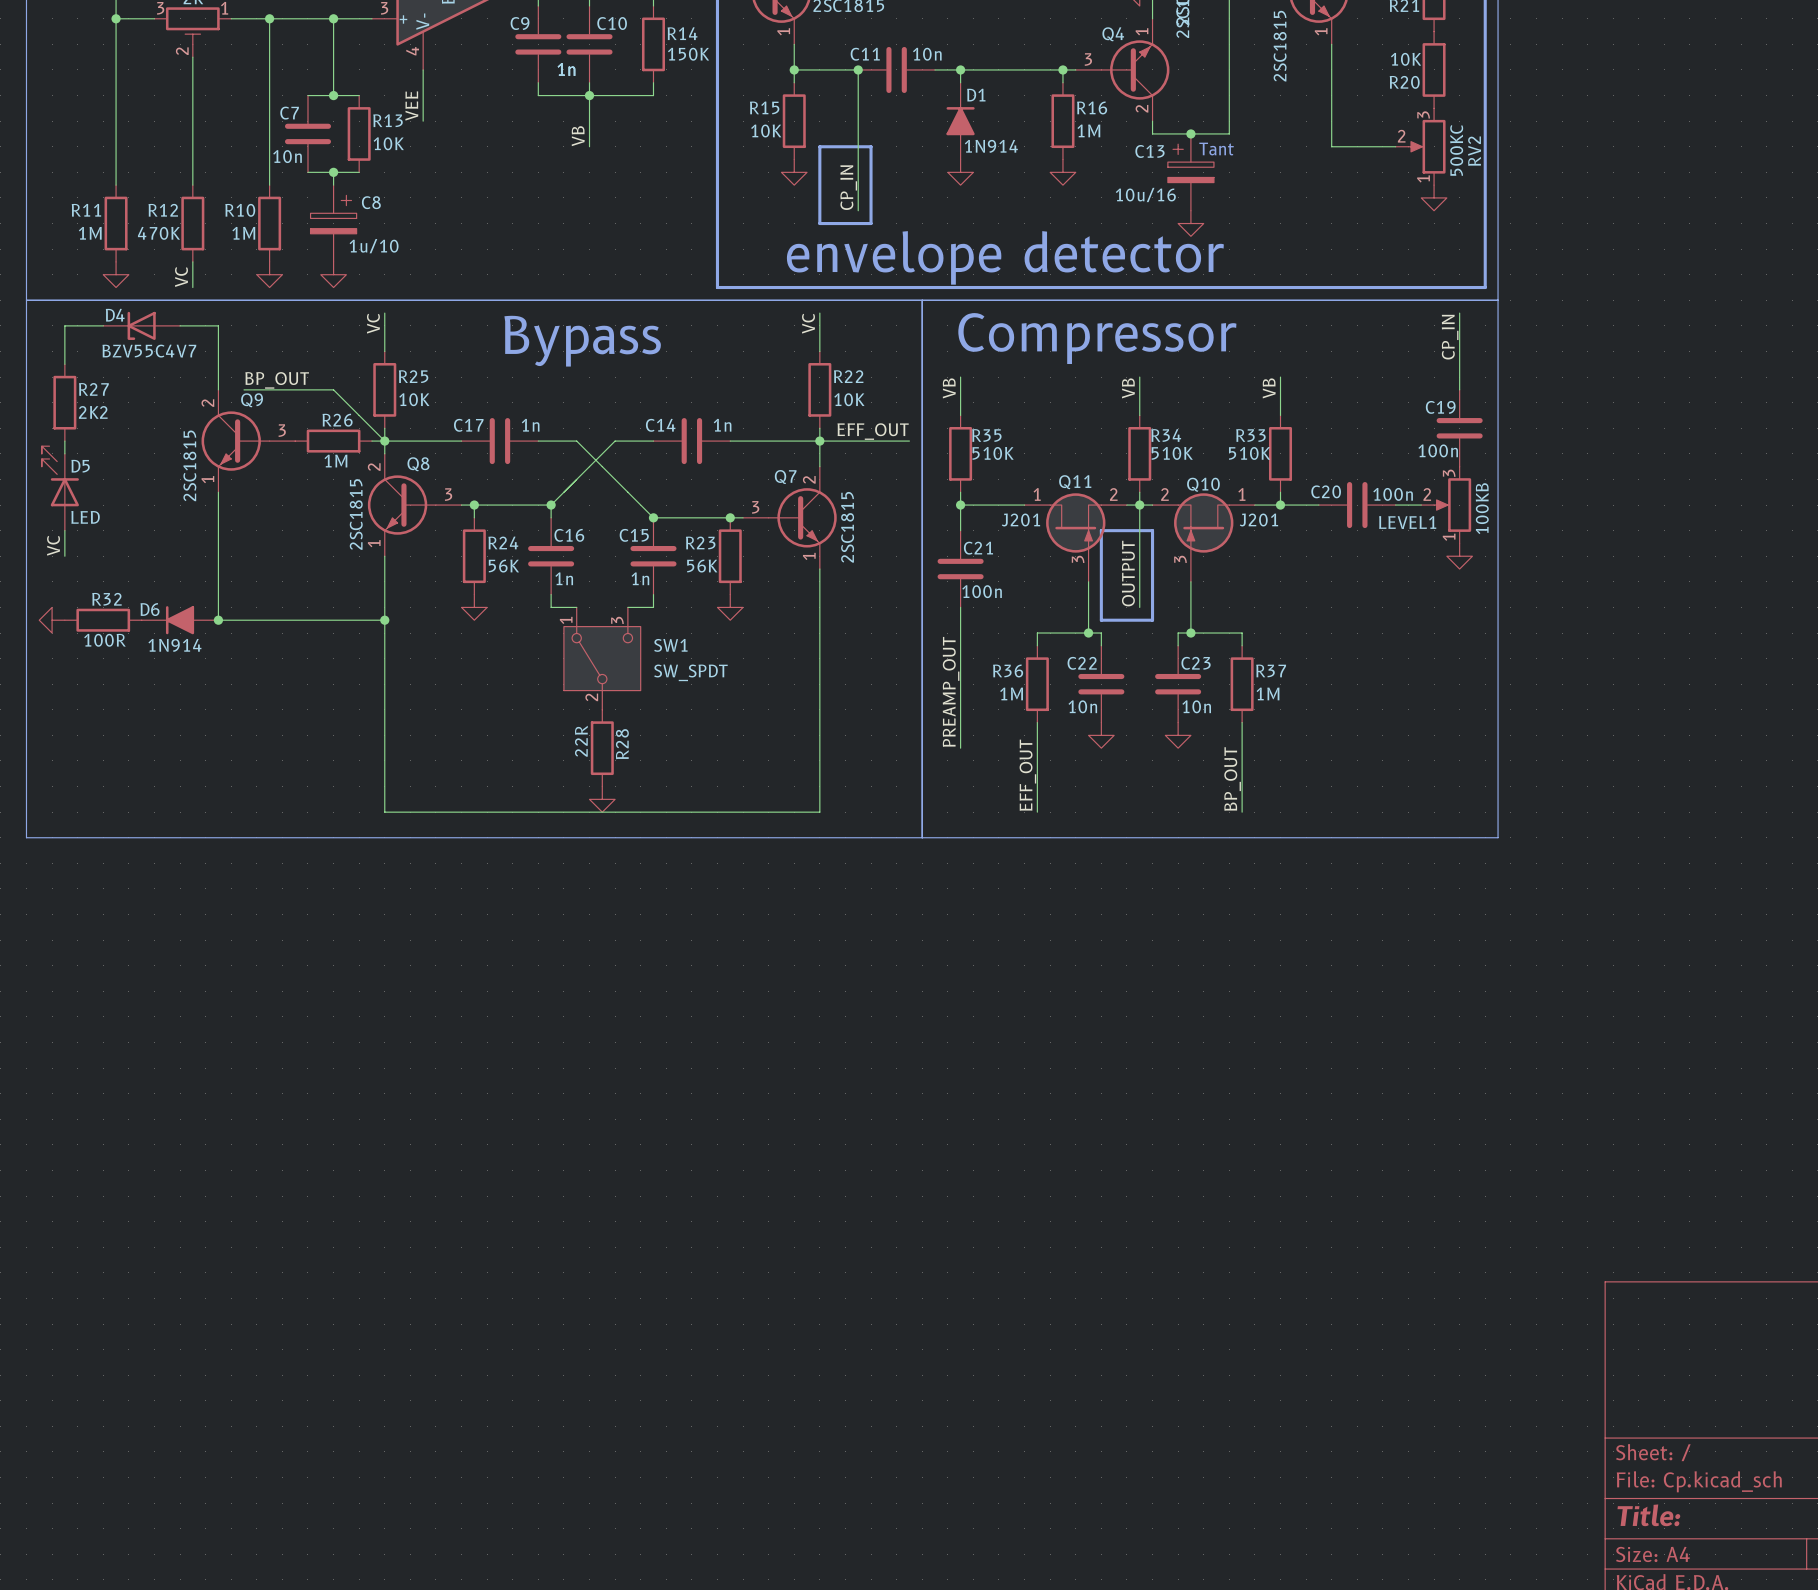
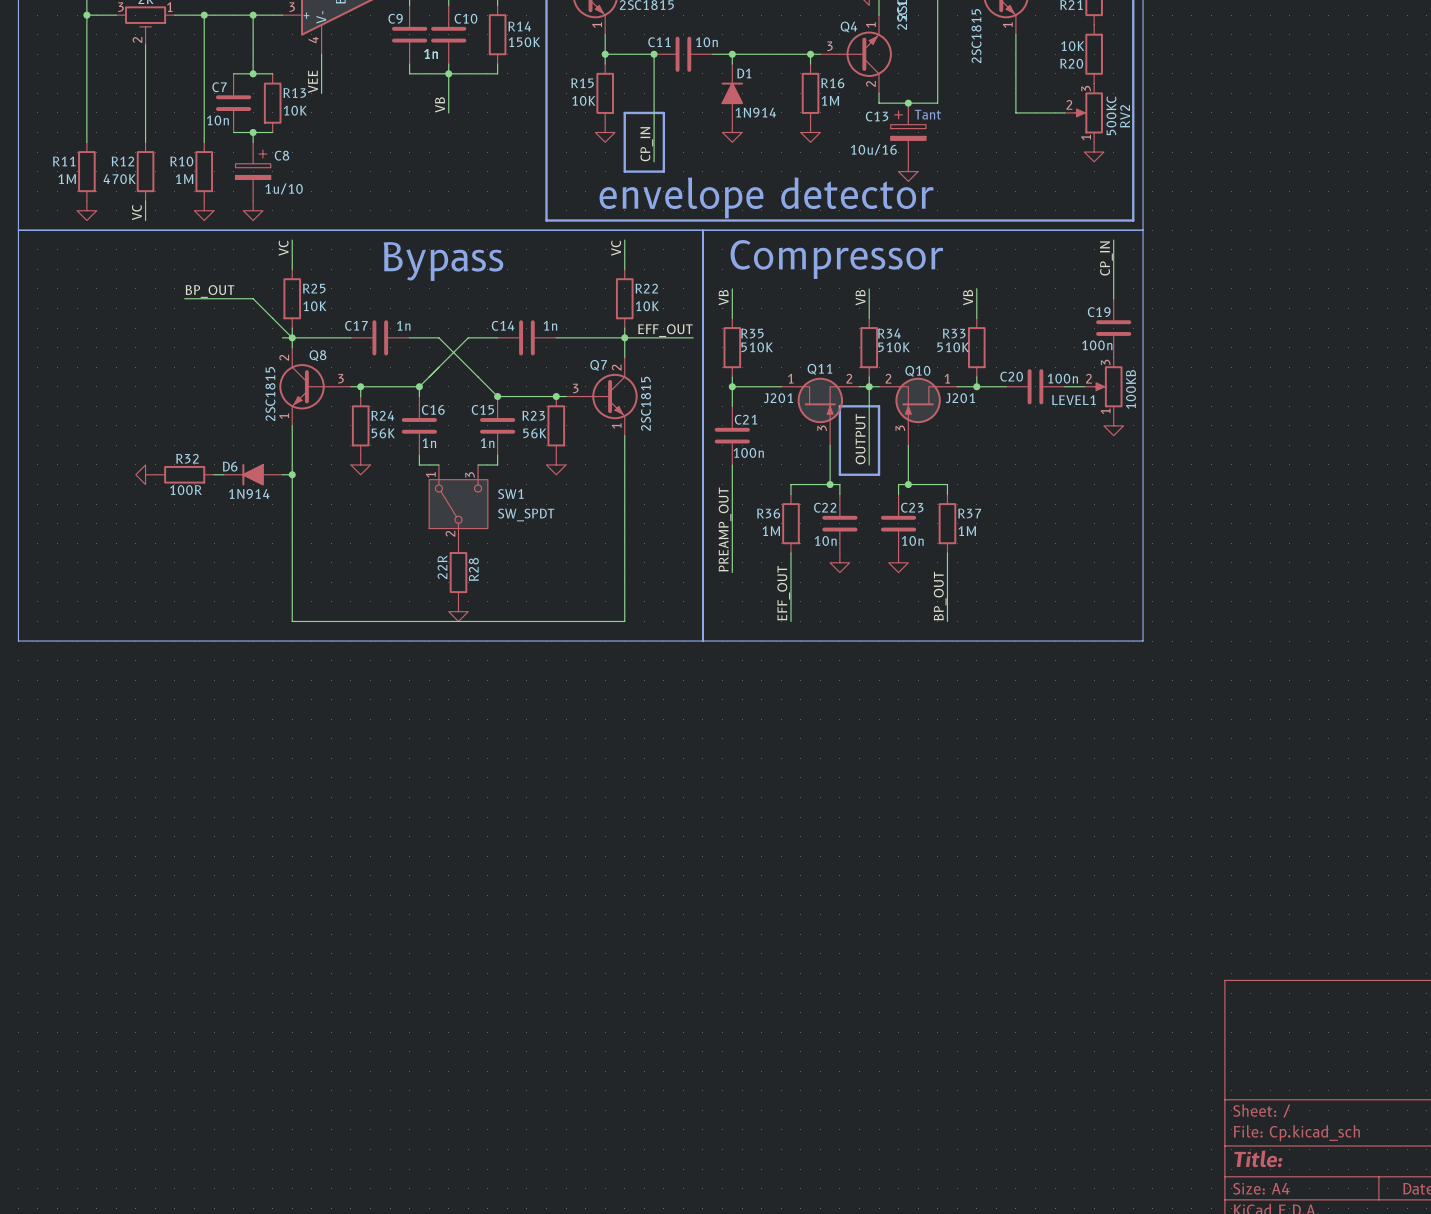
wire: (103, 325) (64, 325) (64, 364) -> none
D4: BZV55C4V7 (141, 325) -> none
wire: (180, 325) (218, 325) (218, 389) -> none
R27: 2K2 (64, 402) -> none
wire: (64, 441) (64, 453) -> none
Q9: 2SC1815 (248, 441) -> none
R26: 1M (333, 441) -> none
D5: LED (60, 488) -> none
wire: (218, 492) (218, 620) (282, 620) -> none
wire: (64, 530) (64, 556) -> none
label: VC (53, 545) -> none
power symbol position: (52, 620) -> (145, 474)
R32 position: (103, 620) -> (184, 474)
D6 position: (180, 620) -> (253, 474)
junction: (218, 620) -> none

